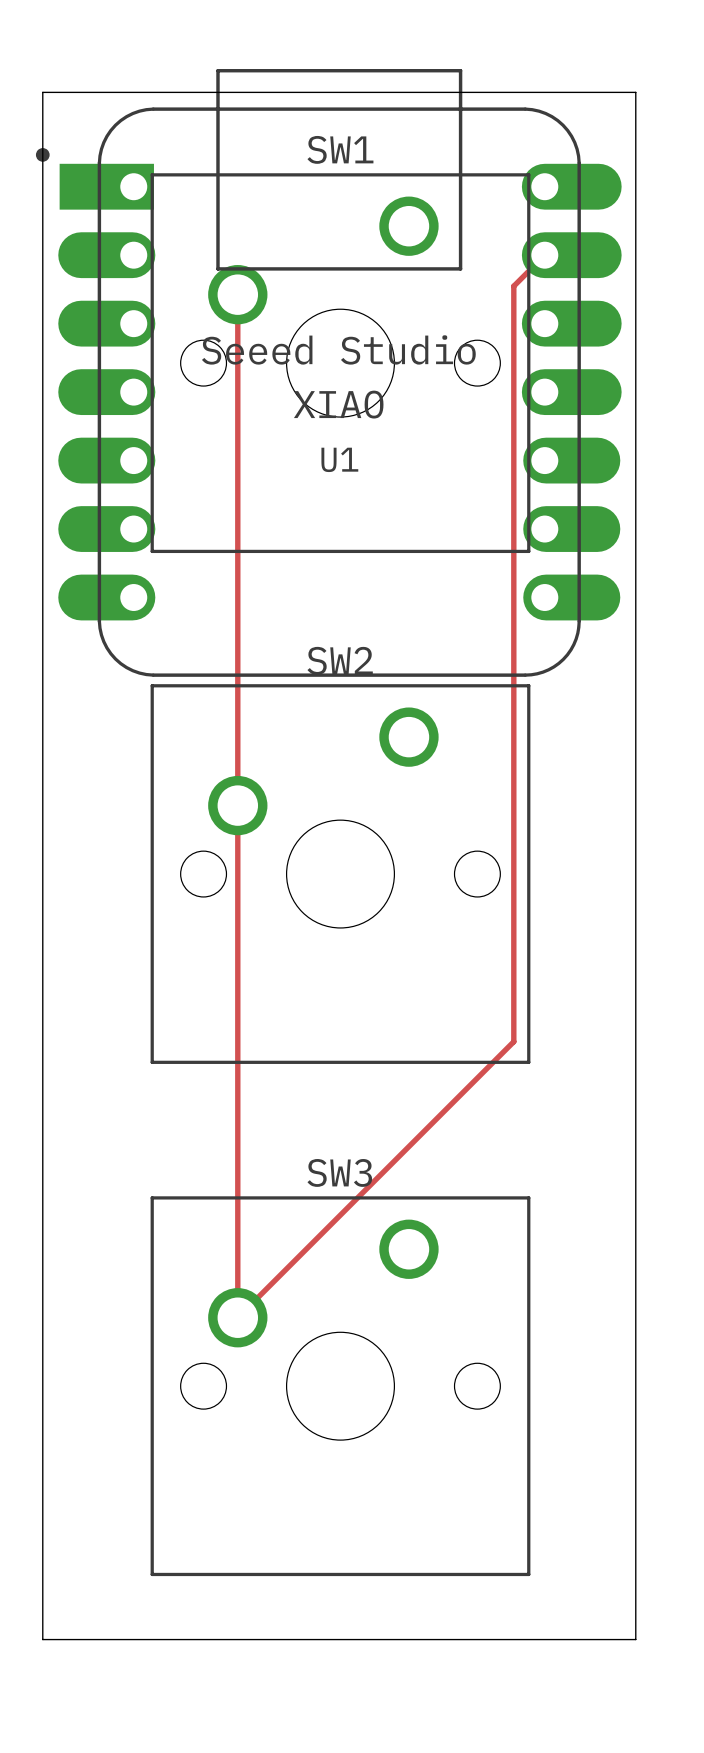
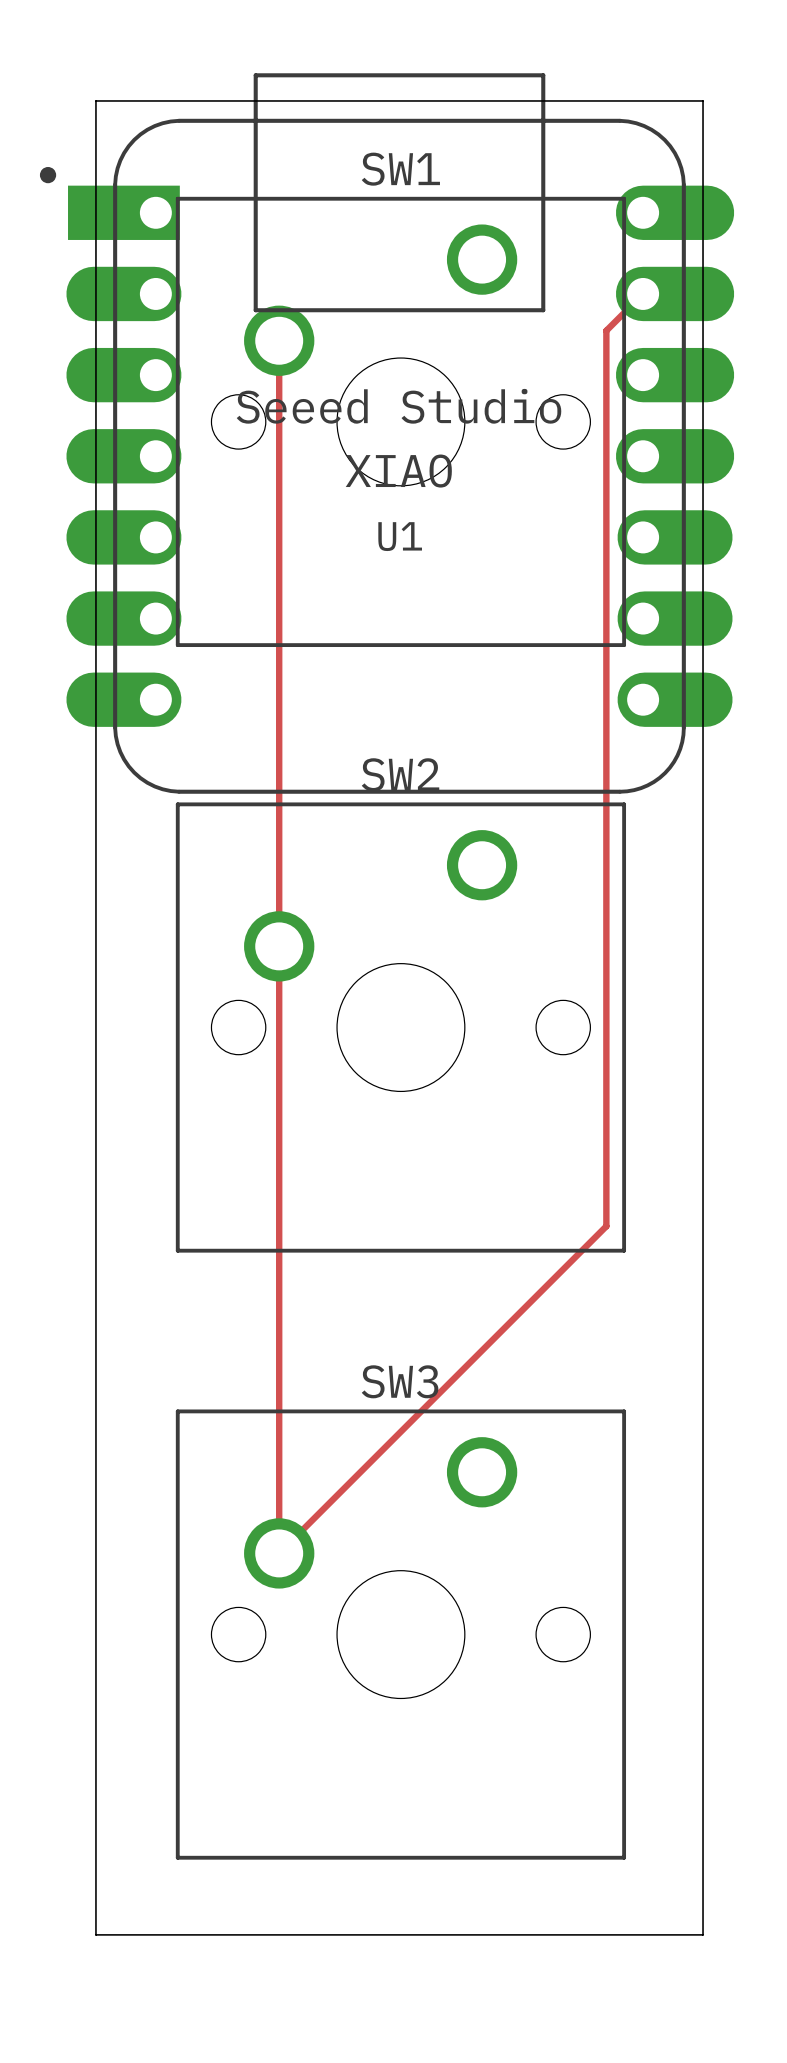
board edge: (83, 92) (42, 92) (42, 1639) (83, 1639) -> (95, 100) (95, 1934)
board edge: (595, 92) (635, 92) (635, 1639) (595, 1639) -> (703, 100) (703, 1934)

